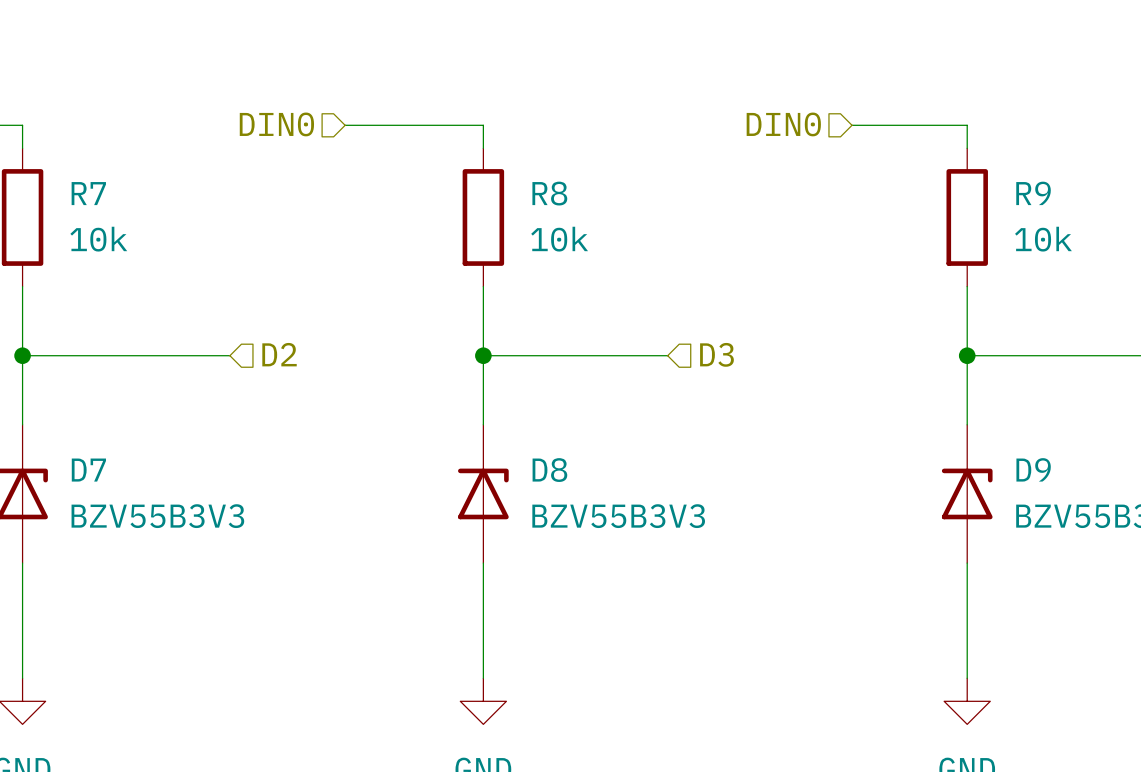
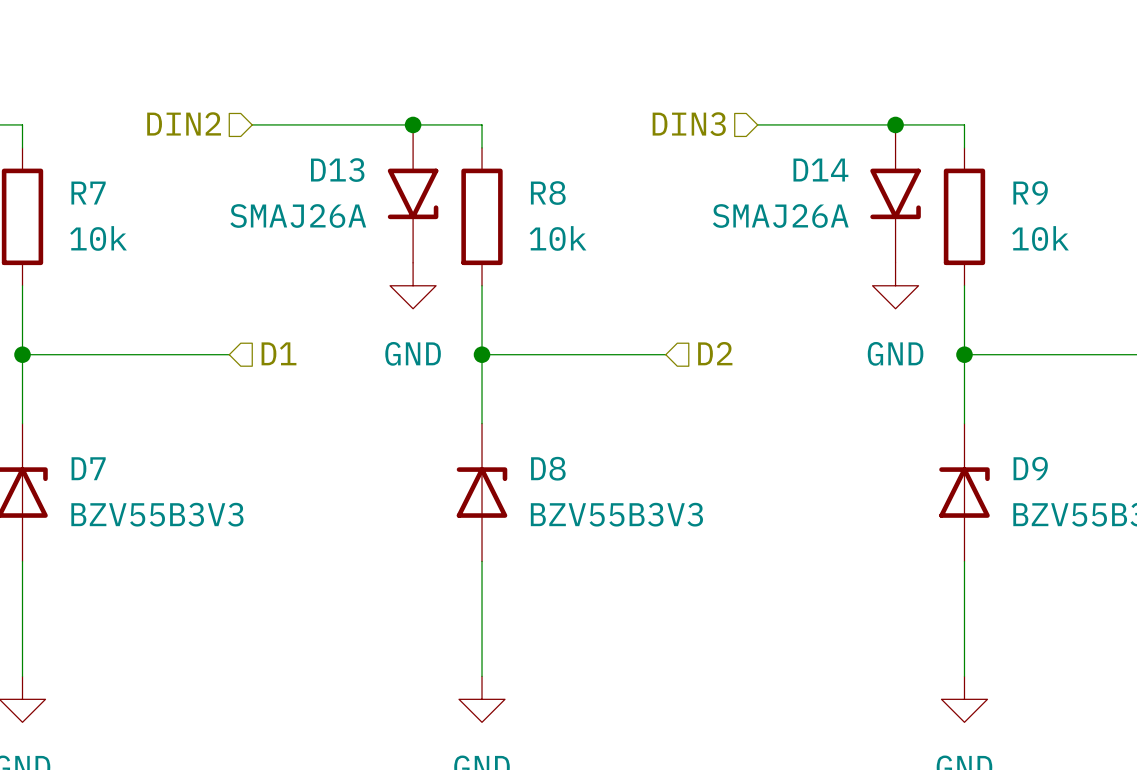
hierarchical label: DIN0 (276, 124) -> DIN2 (184, 123)
hierarchical label: DIN0 (783, 124) -> DIN3 (689, 124)
wire: none -> (252, 124) (344, 124)
junction: none -> (413, 124)
wire: none -> (757, 124) (849, 124)
junction: none -> (895, 124)
D13: none -> SMAJ26A (413, 193)
D14: none -> SMAJ26A (895, 193)
power symbol: none -> GND (413, 285)
power symbol: none -> GND (895, 285)
hierarchical label: D2 (279, 354) -> D1 (278, 353)
hierarchical label: D3 (716, 354) -> D2 (715, 353)

